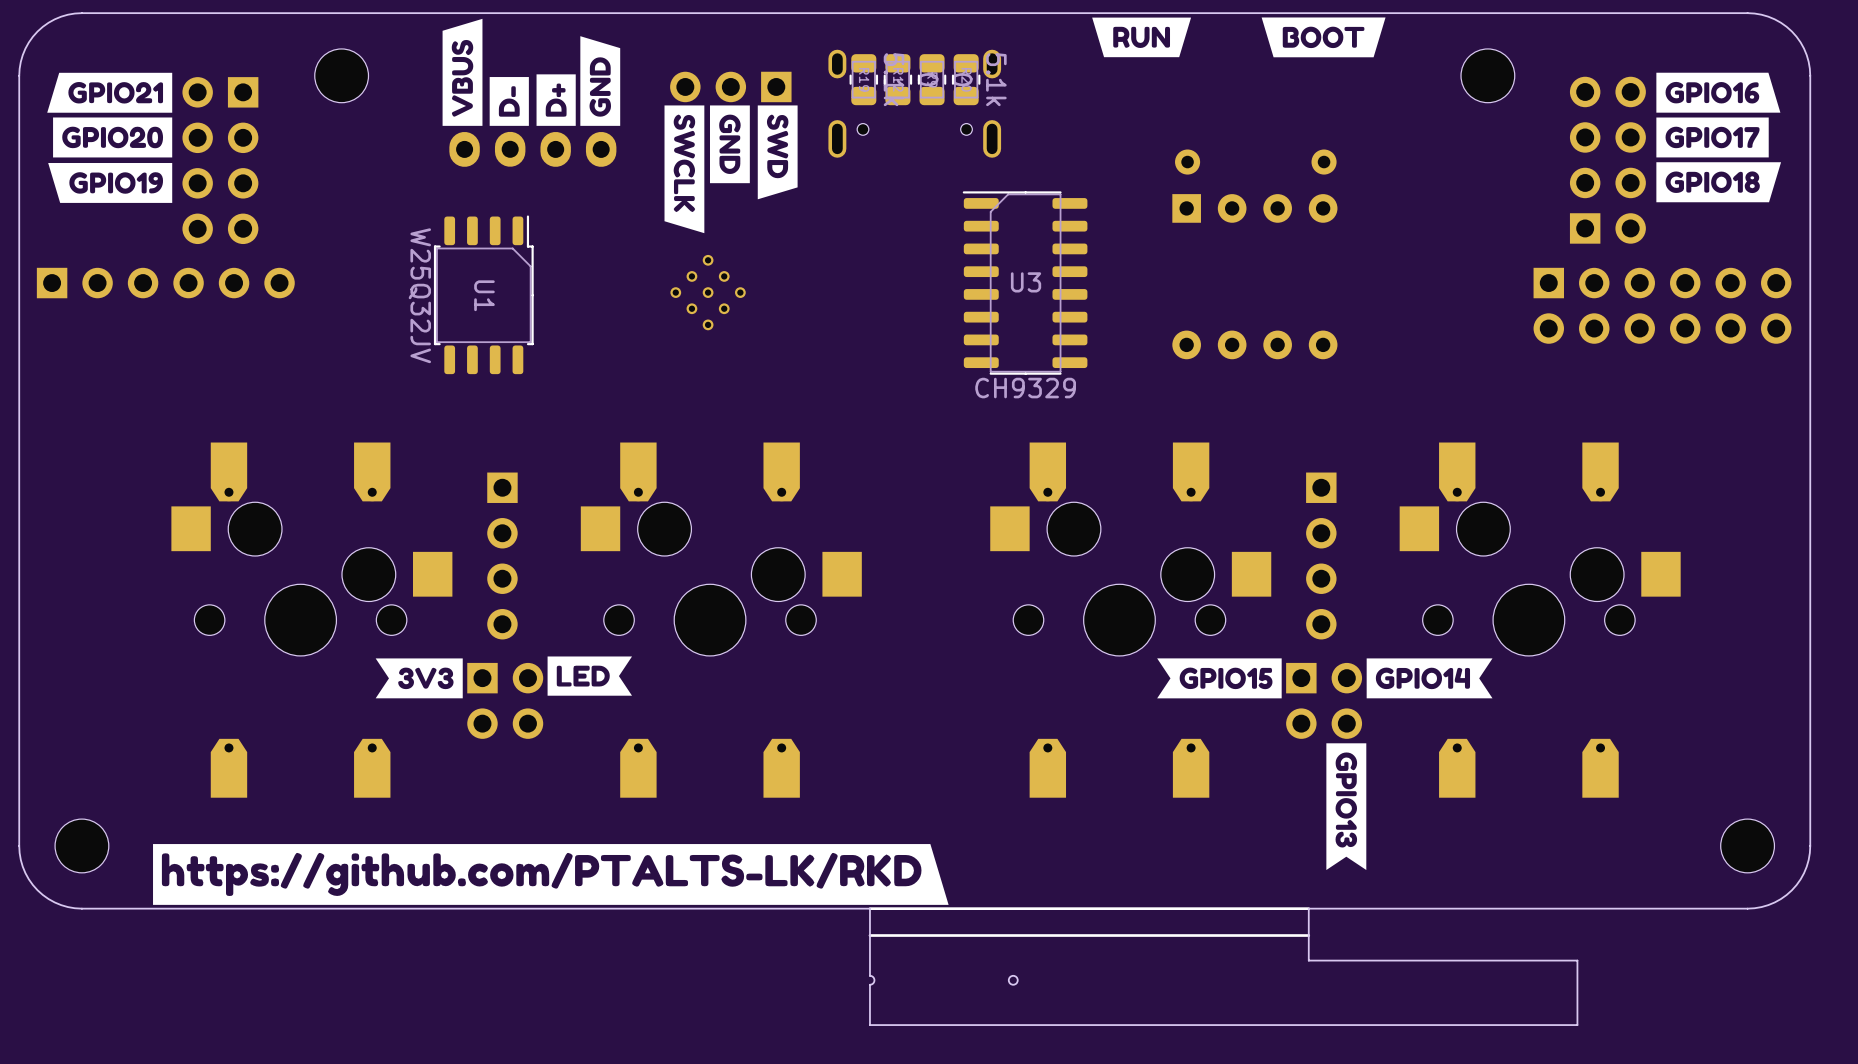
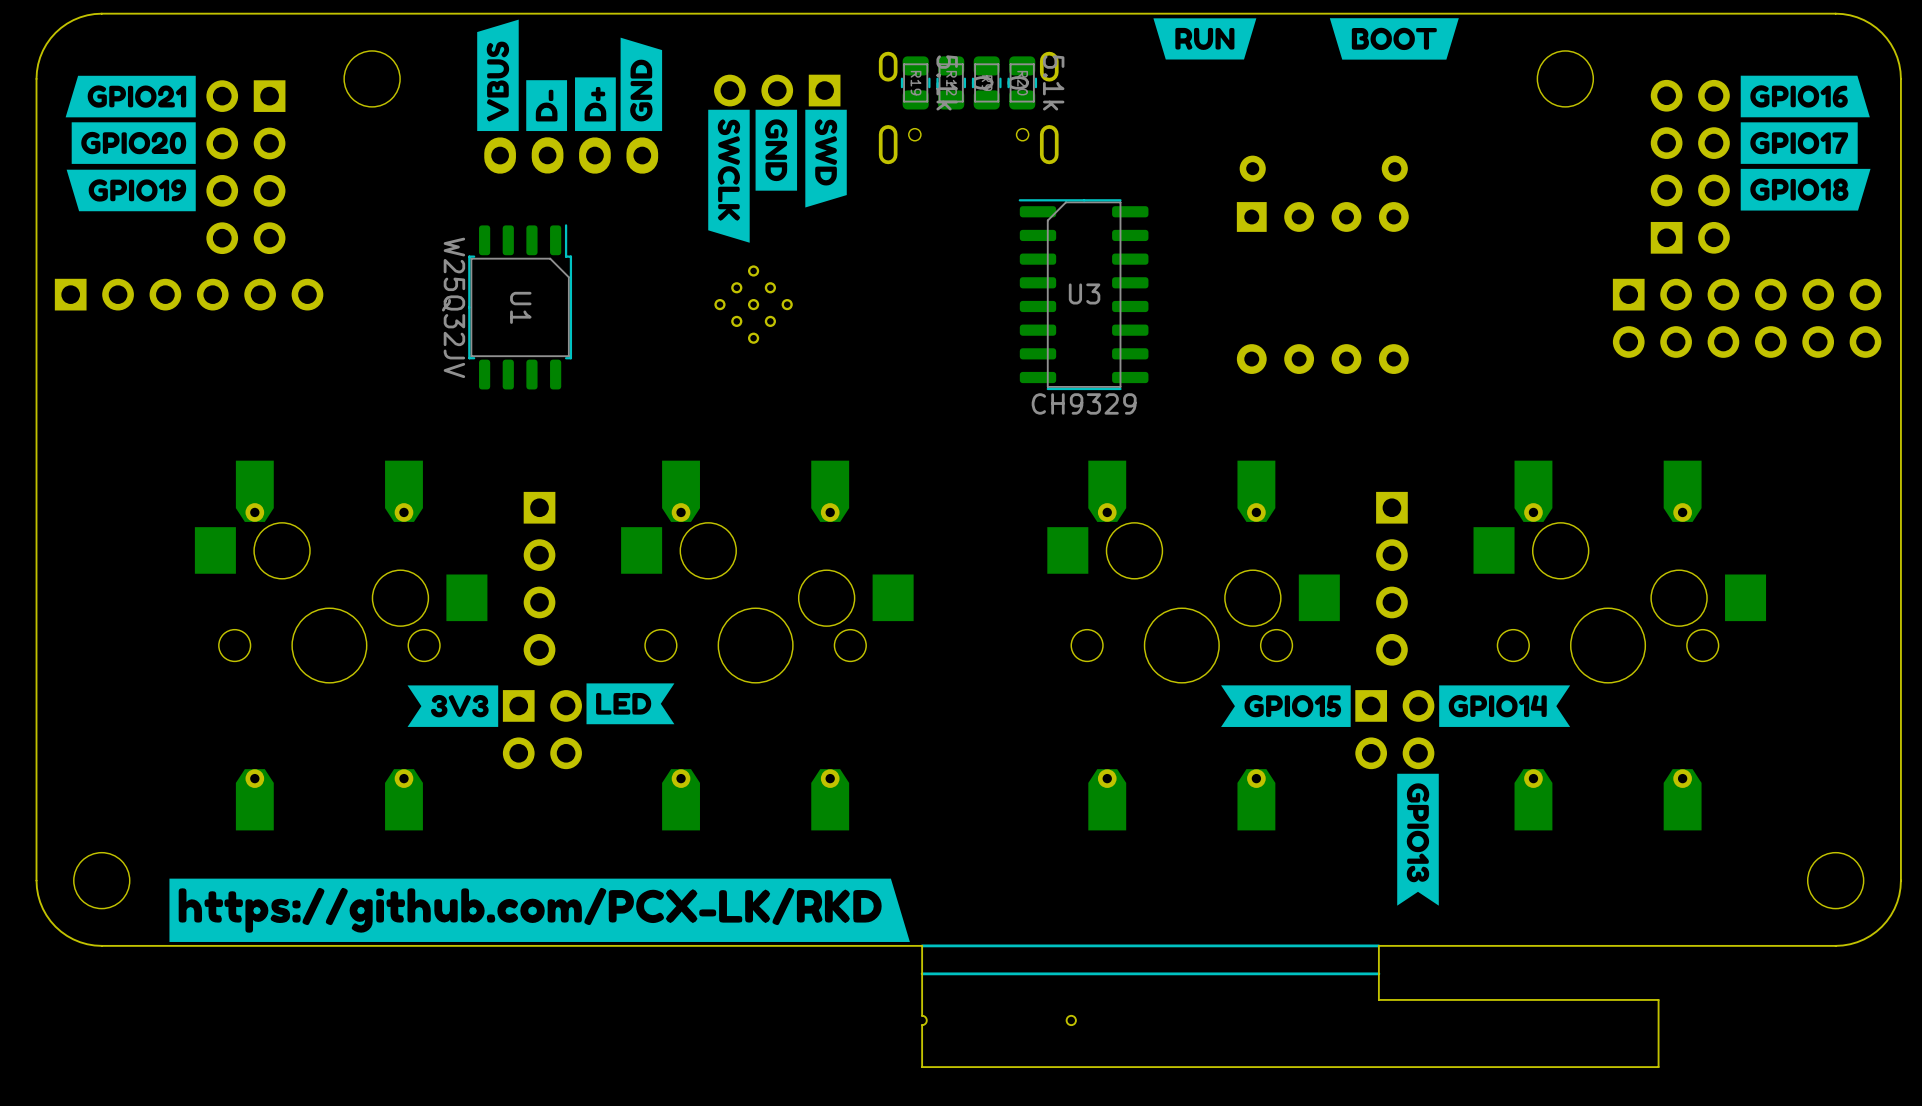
drawing: none -> [169, 878, 910, 942]
drawing: [153, 844, 949, 905] -> none

